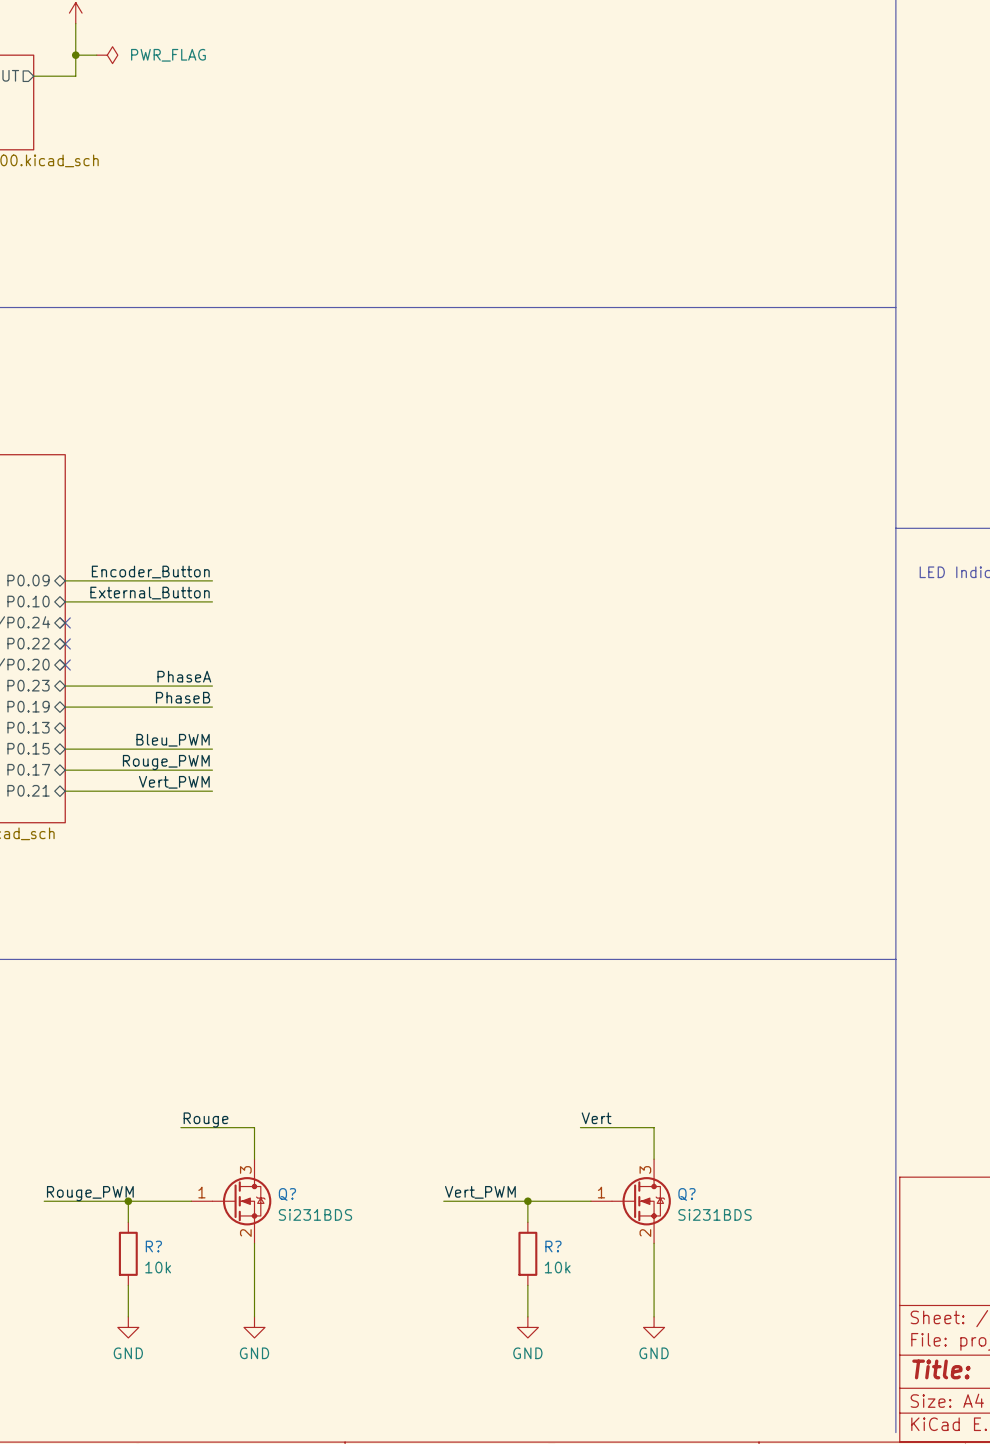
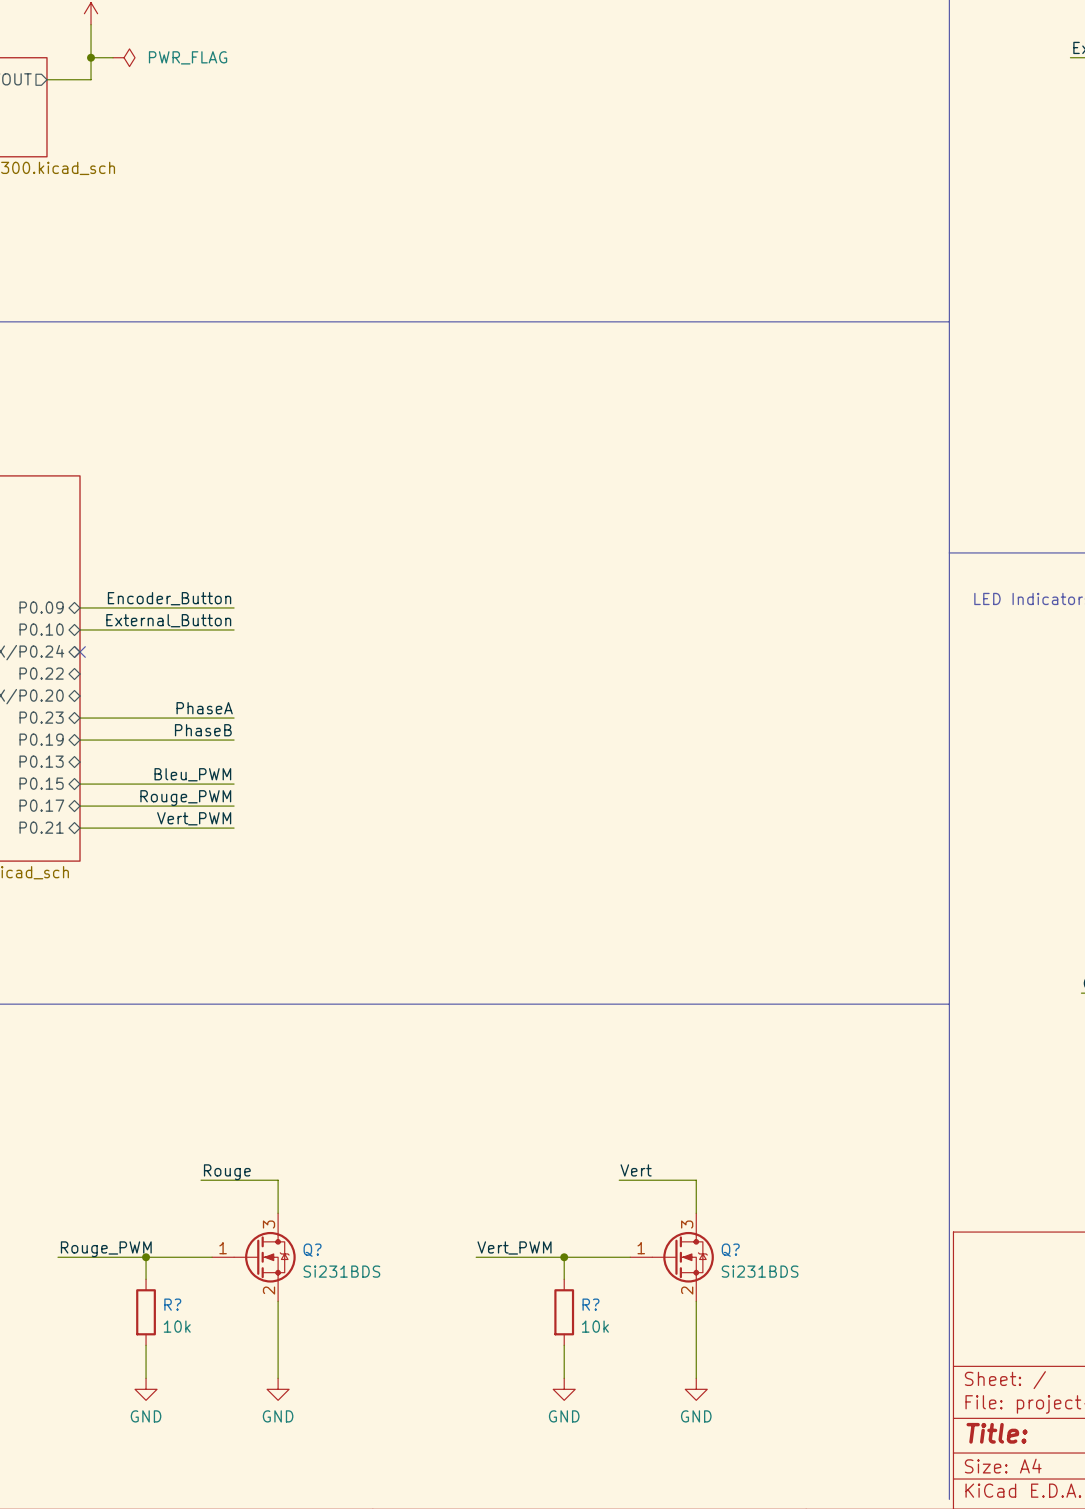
no-connect mark: (65, 643) -> none
no-connect mark: (65, 665) -> none

